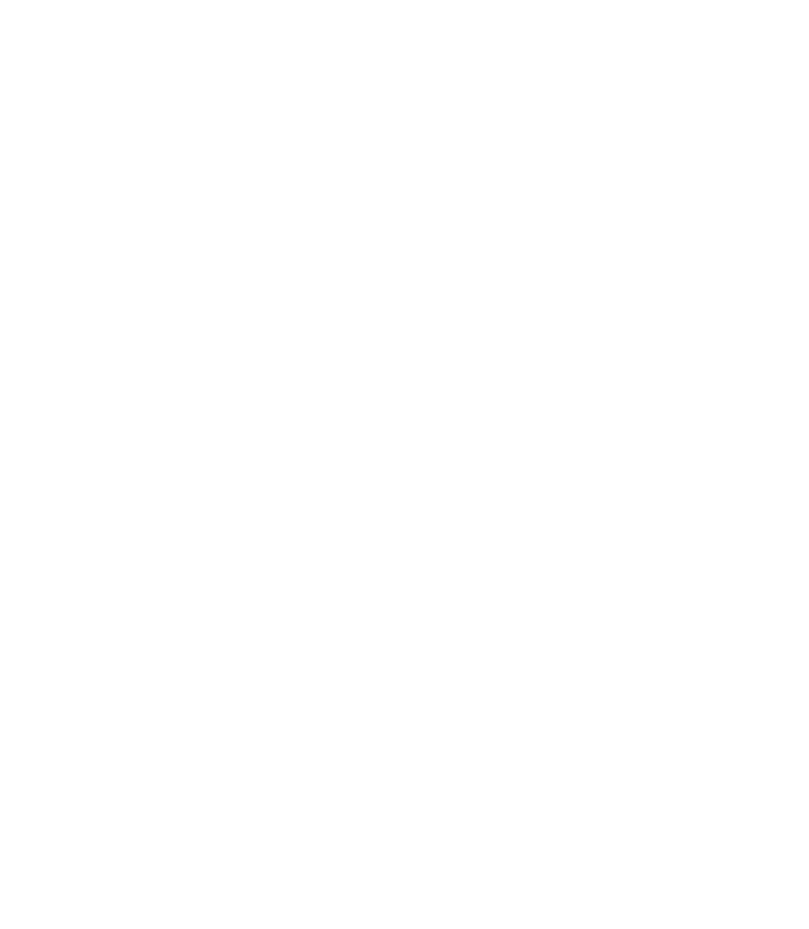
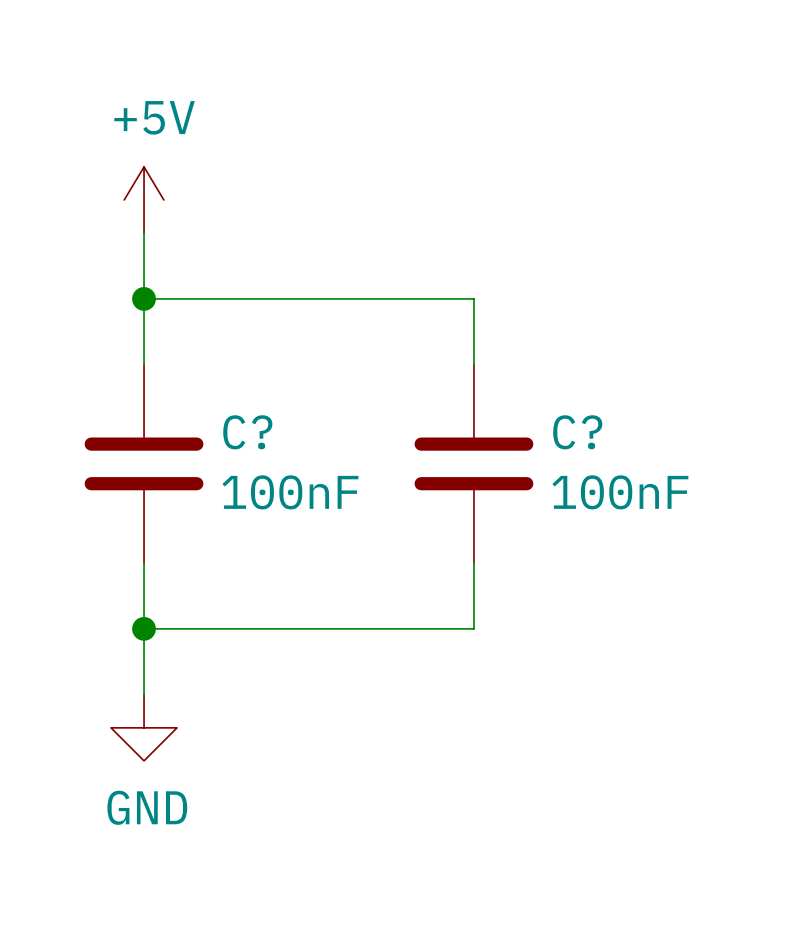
power symbol: none -> +5V (144, 199)
wire: none -> (144, 232) (144, 364)
wire: none -> (144, 298) (473, 298) (473, 364)
junction: none -> (144, 298)
C?: none -> 100nF (144, 463)
C?: none -> 100nF (473, 463)
wire: none -> (144, 562) (144, 694)
wire: none -> (473, 562) (473, 628) (144, 628)
junction: none -> (144, 628)
power symbol: none -> GND (144, 727)

